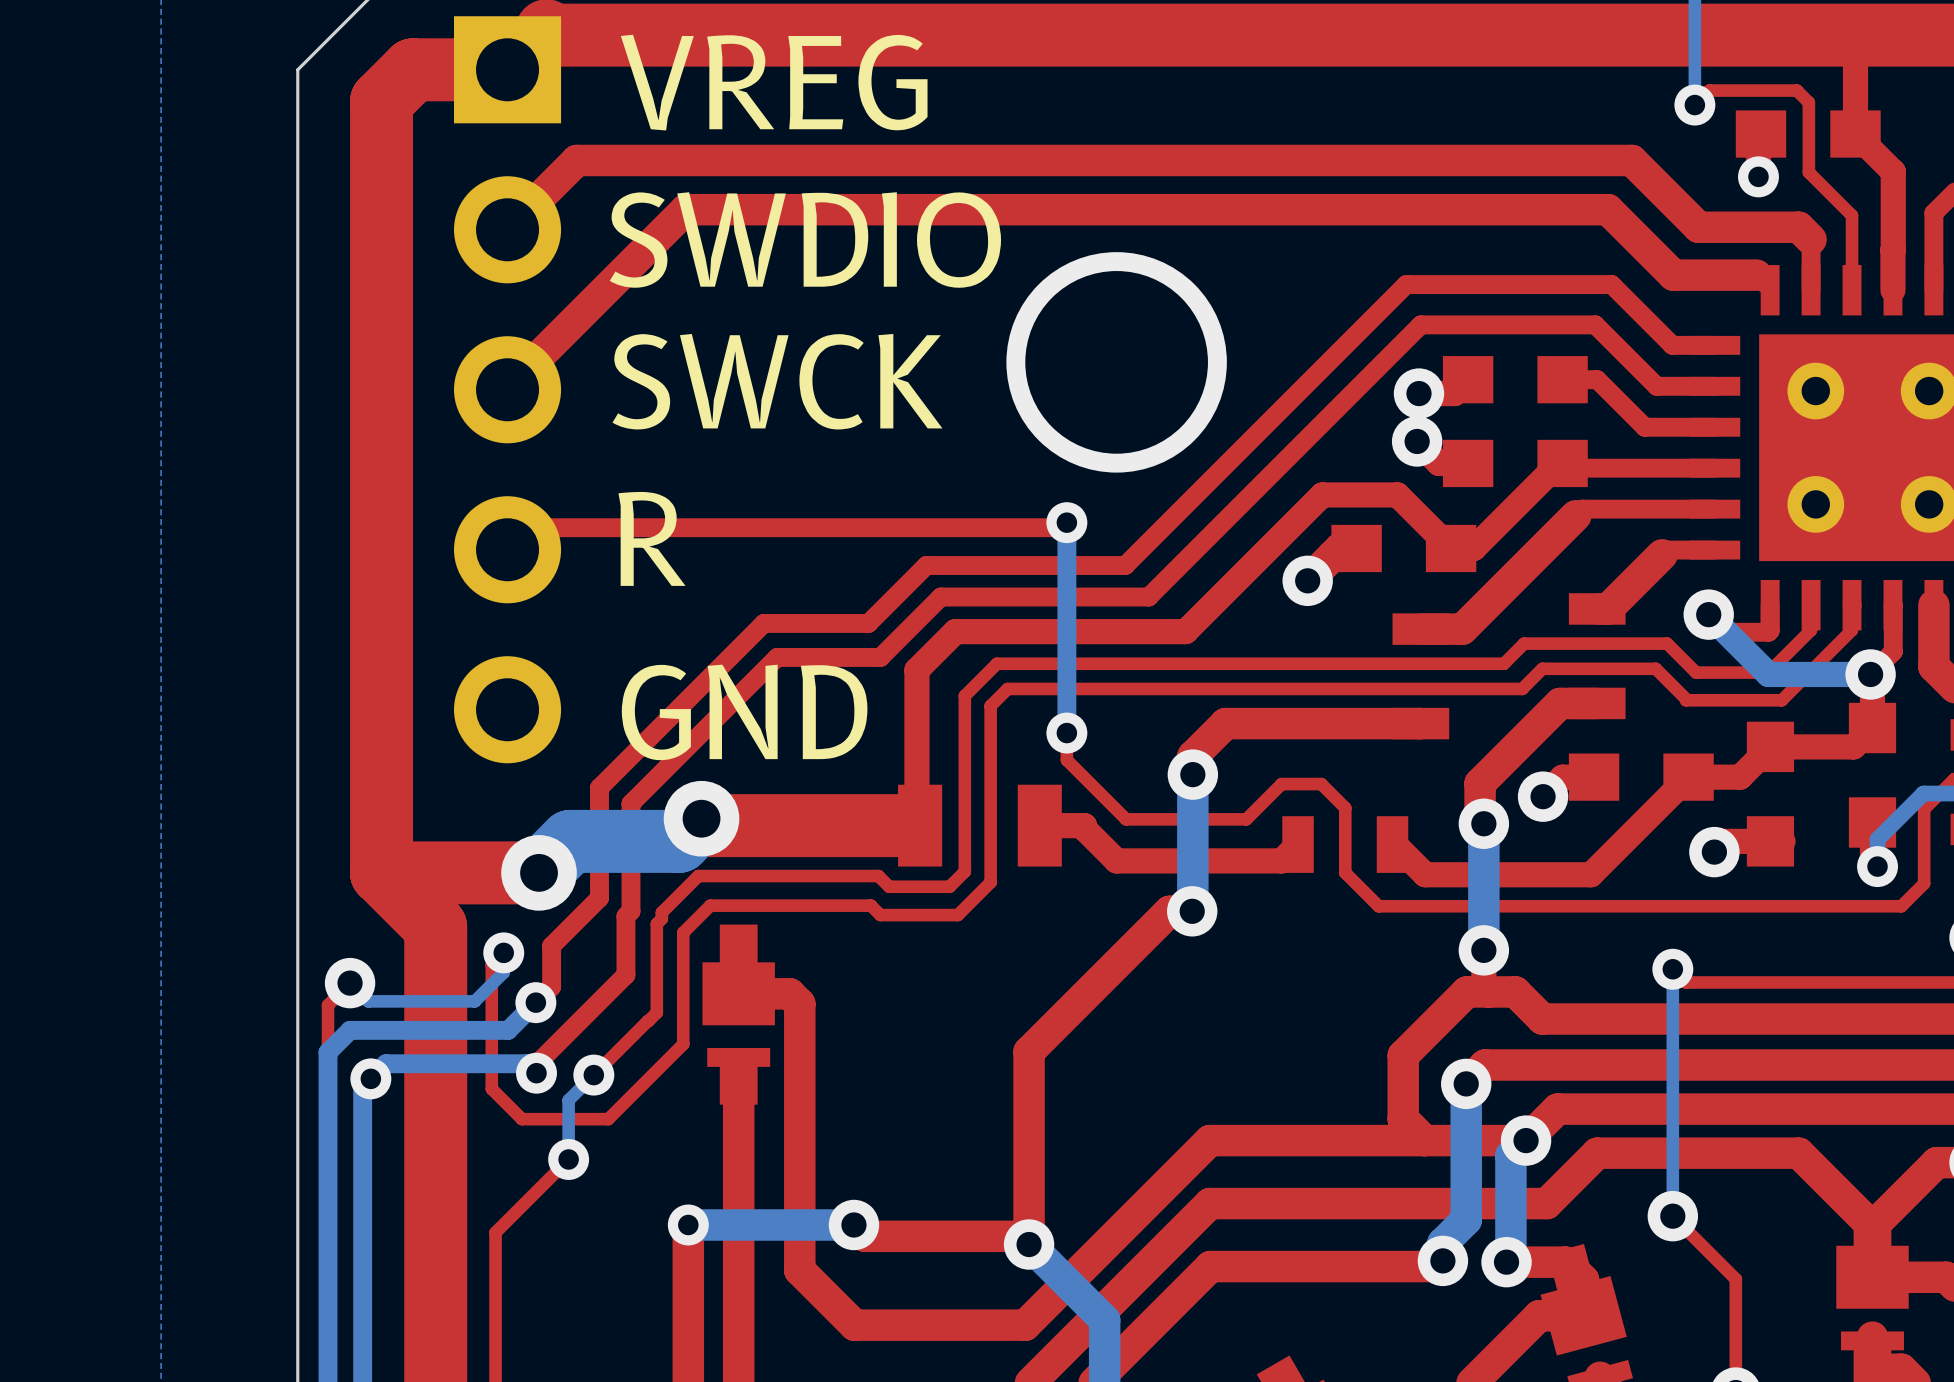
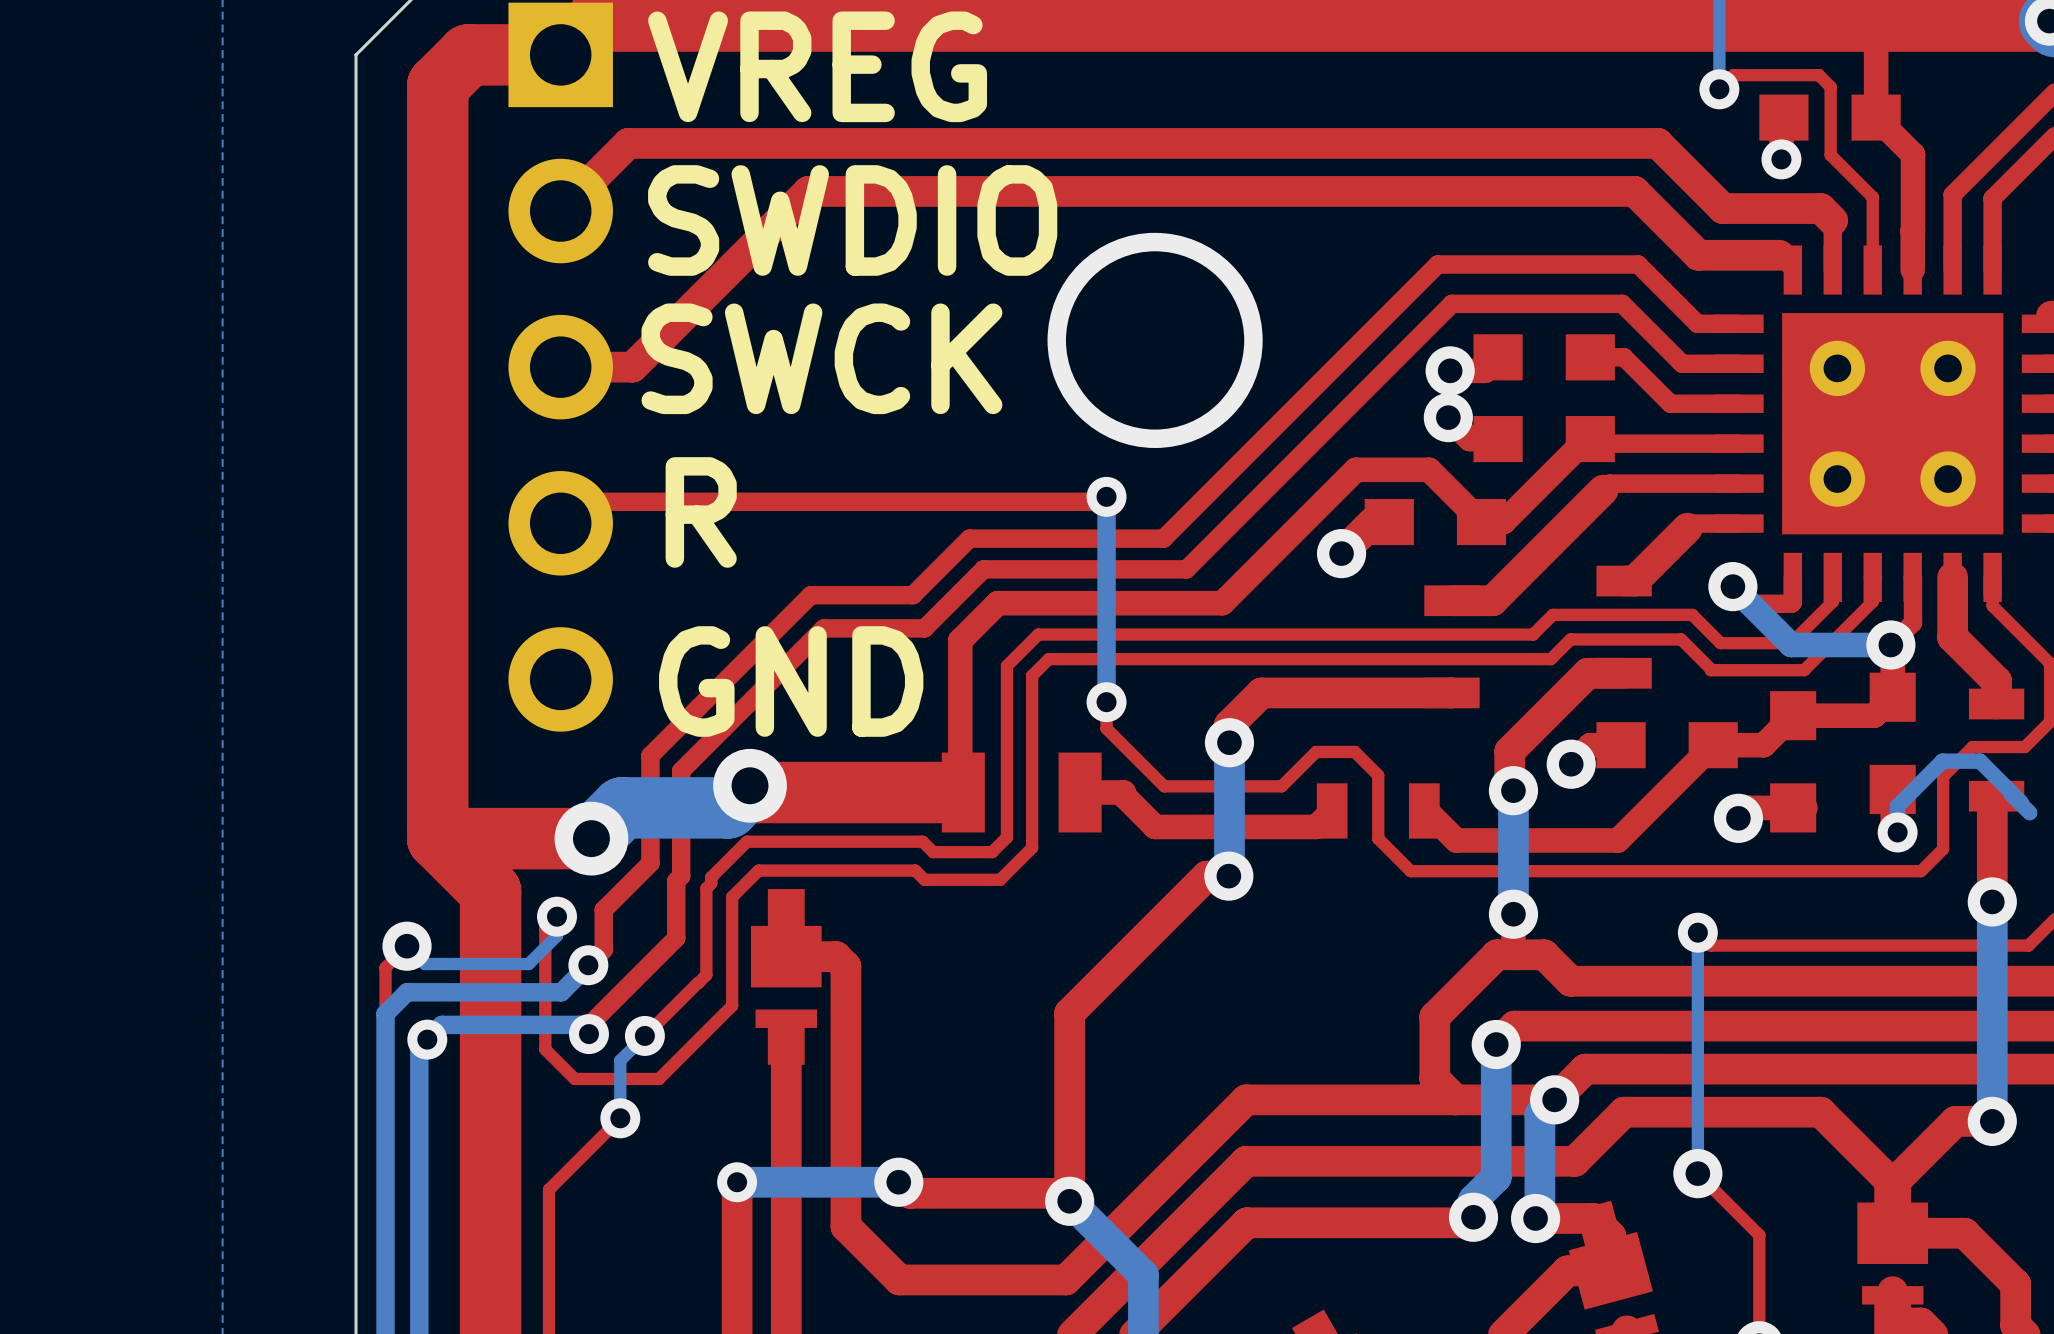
top track: (761, 209) (685, 209) (507, 387) -> (808, 191) (632, 367) (560, 367)

